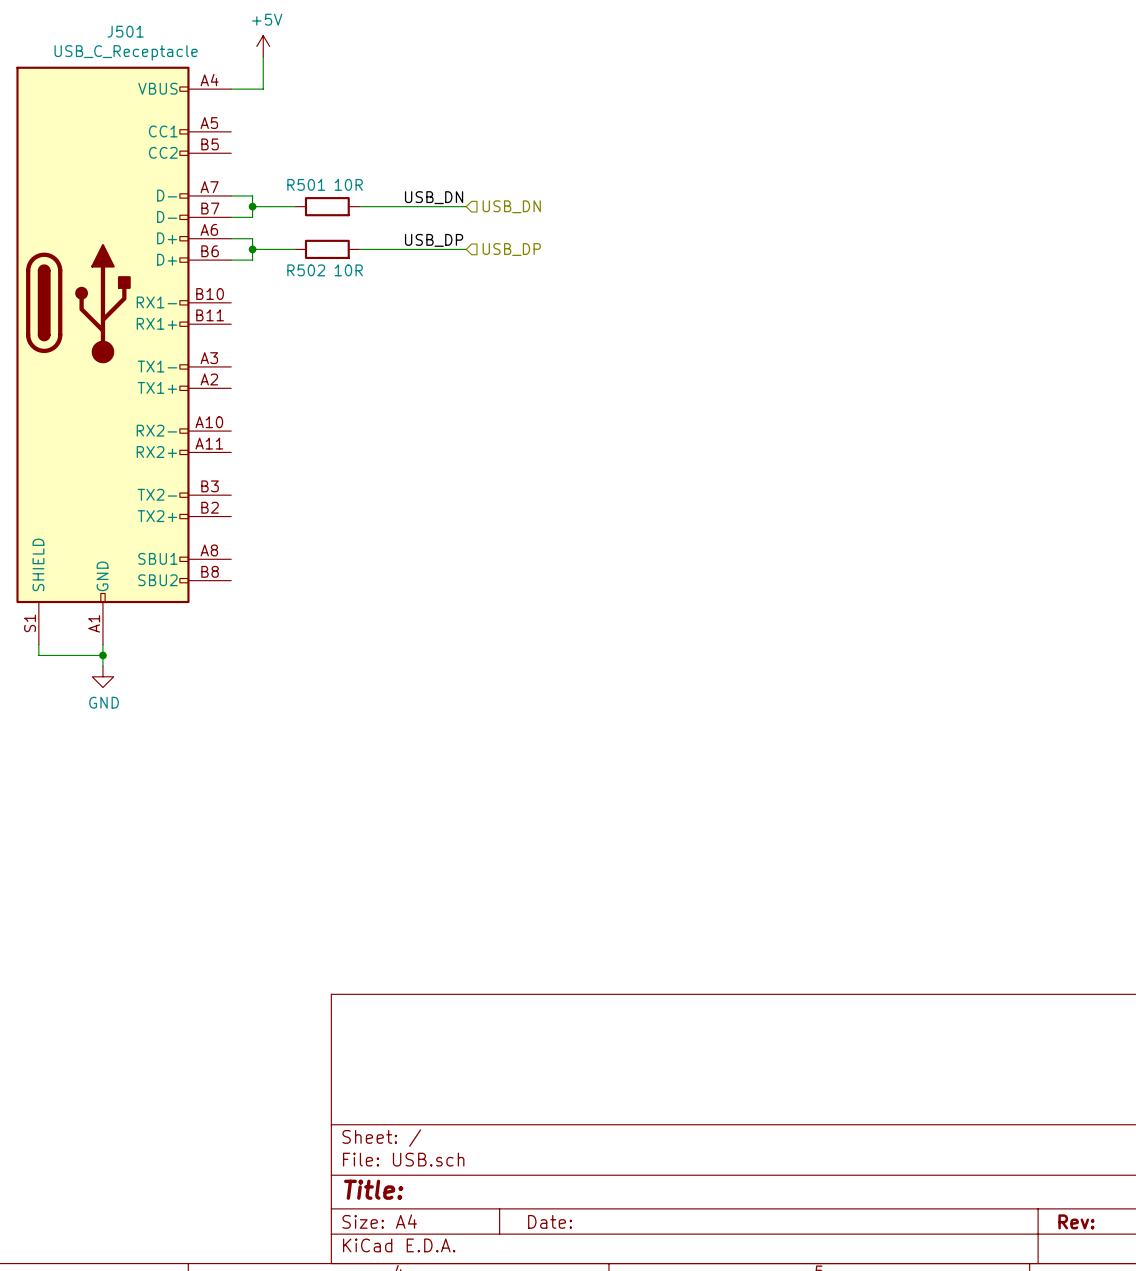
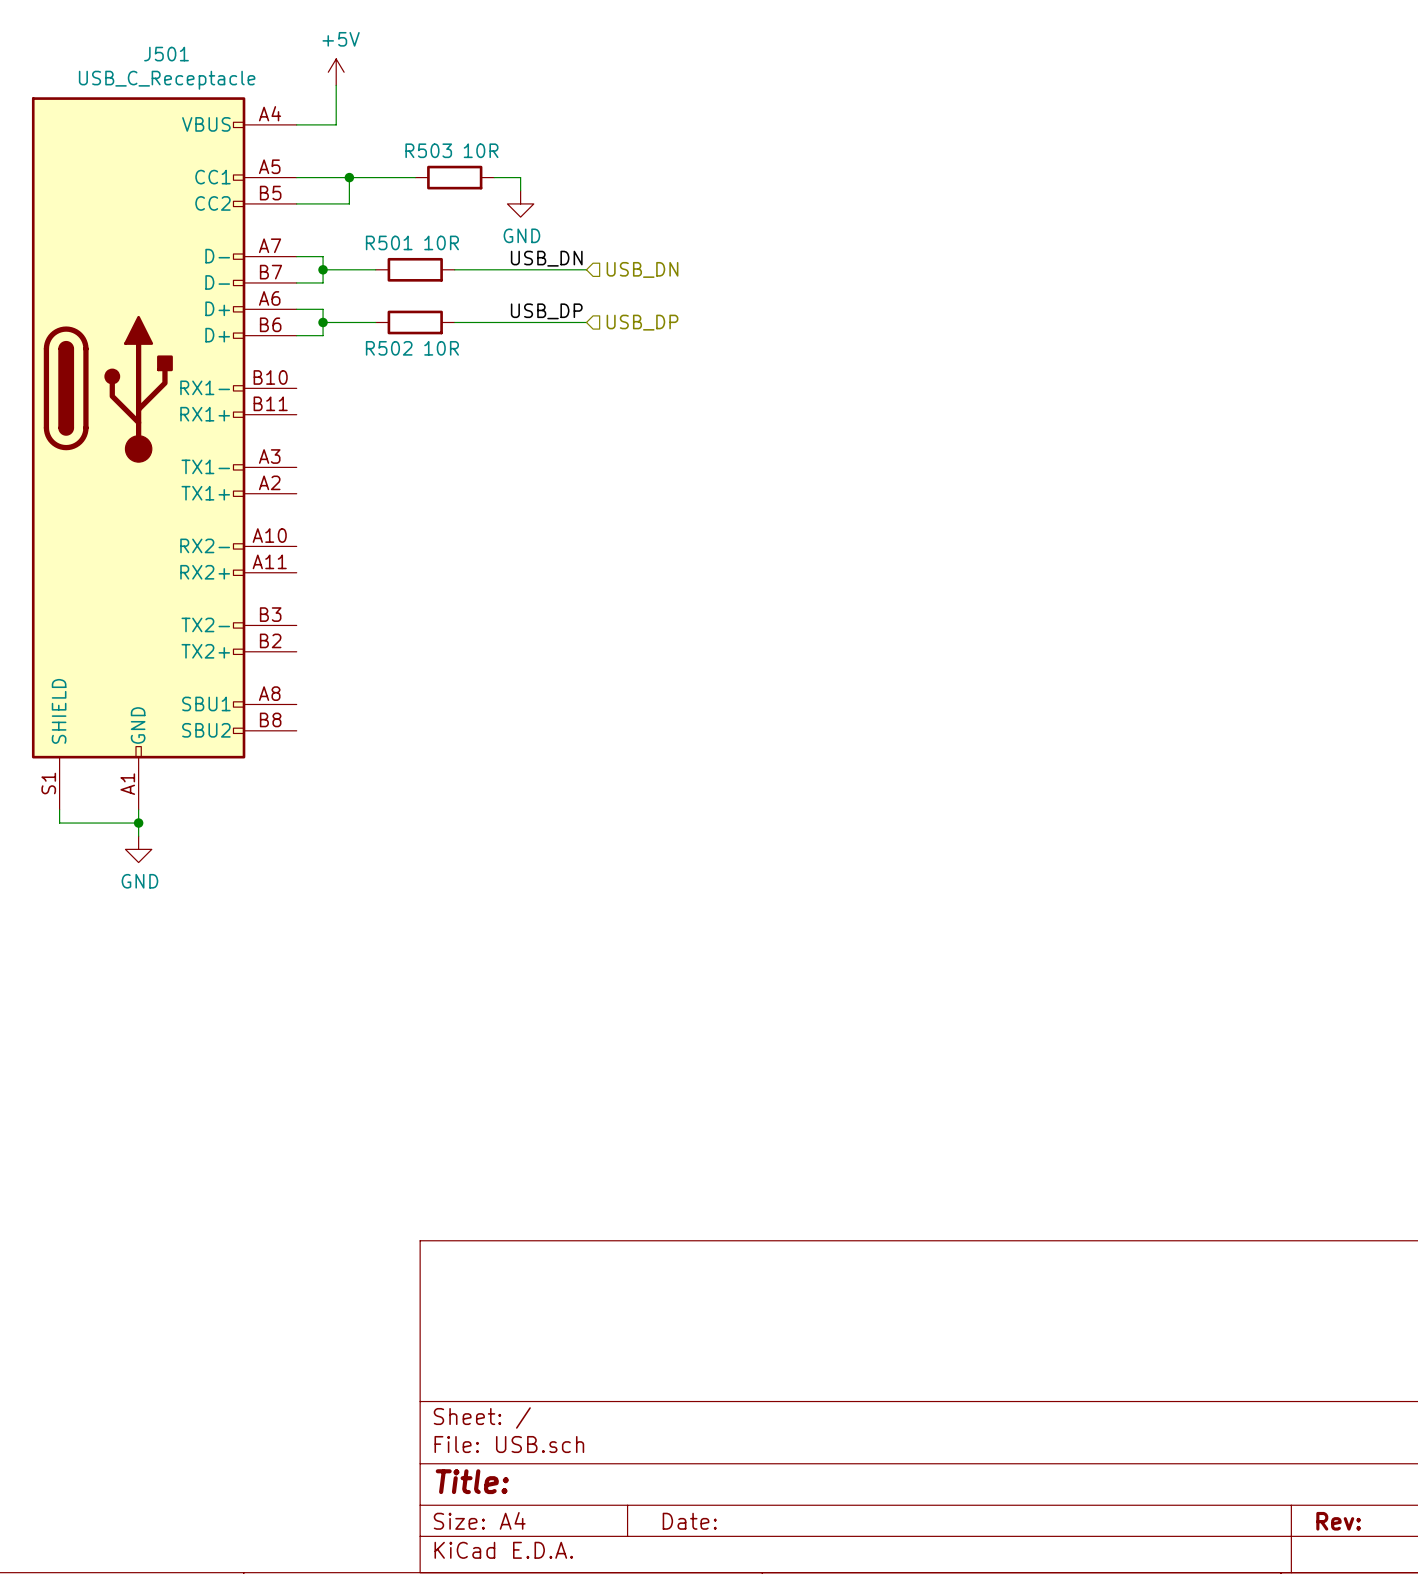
wire: none -> (296, 177) (415, 177)
wire: none -> (349, 177) (349, 203) (296, 203)
junction: none -> (349, 177)
R503: none -> 10R (454, 177)
wire: none -> (494, 177) (520, 177) (520, 190)
power symbol: none -> GND (520, 203)

